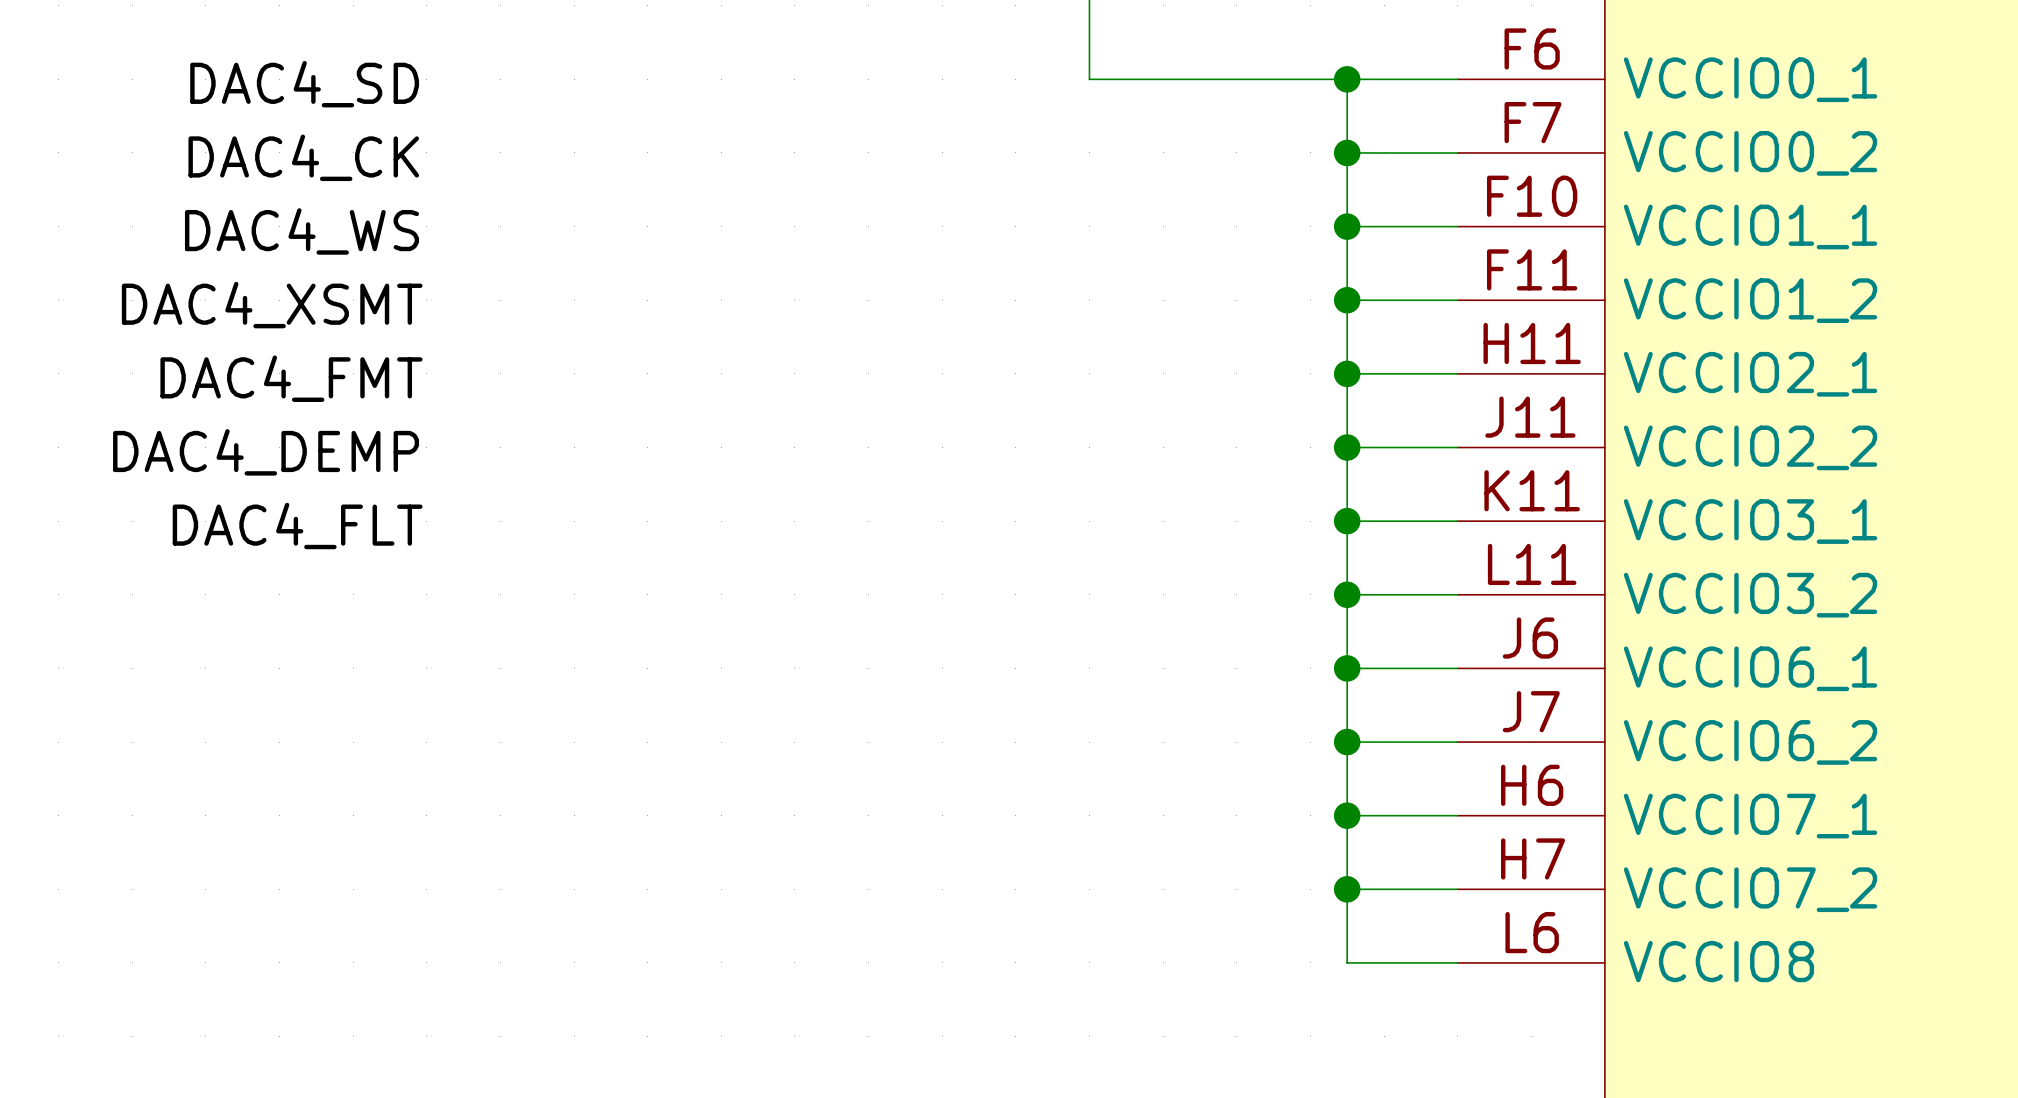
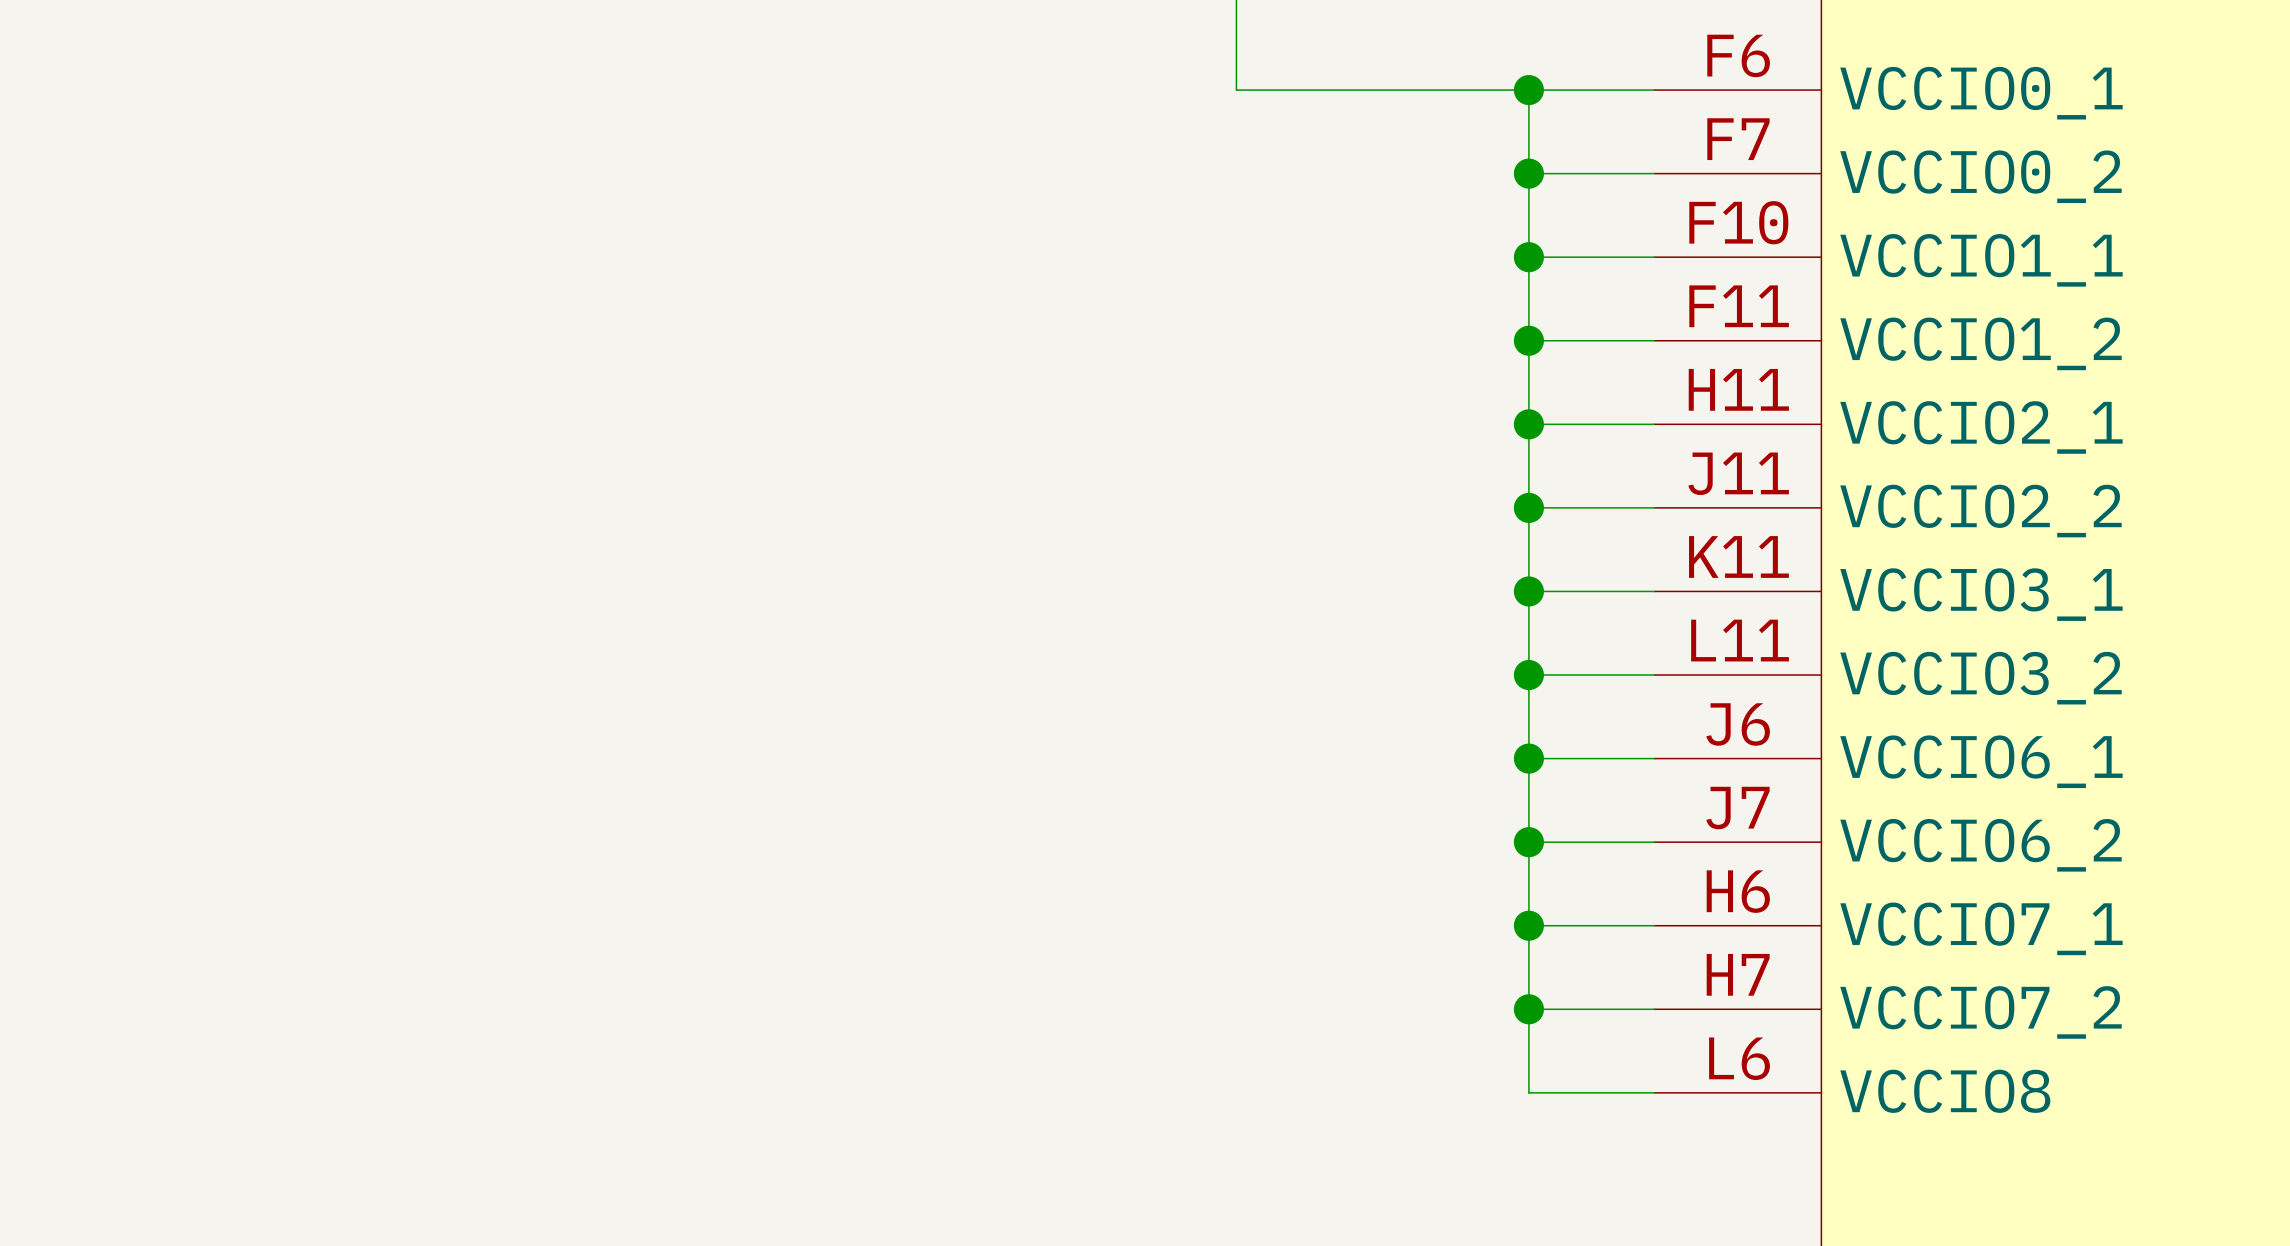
label: DAC4_SD (304, 84) -> none
label: DAC4_CK (303, 157) -> none
label: DAC4_WS (302, 231) -> none
label: DAC4_XSMT (272, 305) -> none
label: DAC4_FMT (291, 378) -> none
label: DAC4_DEMP (266, 452) -> none
label: DAC4_FLT (297, 525) -> none

